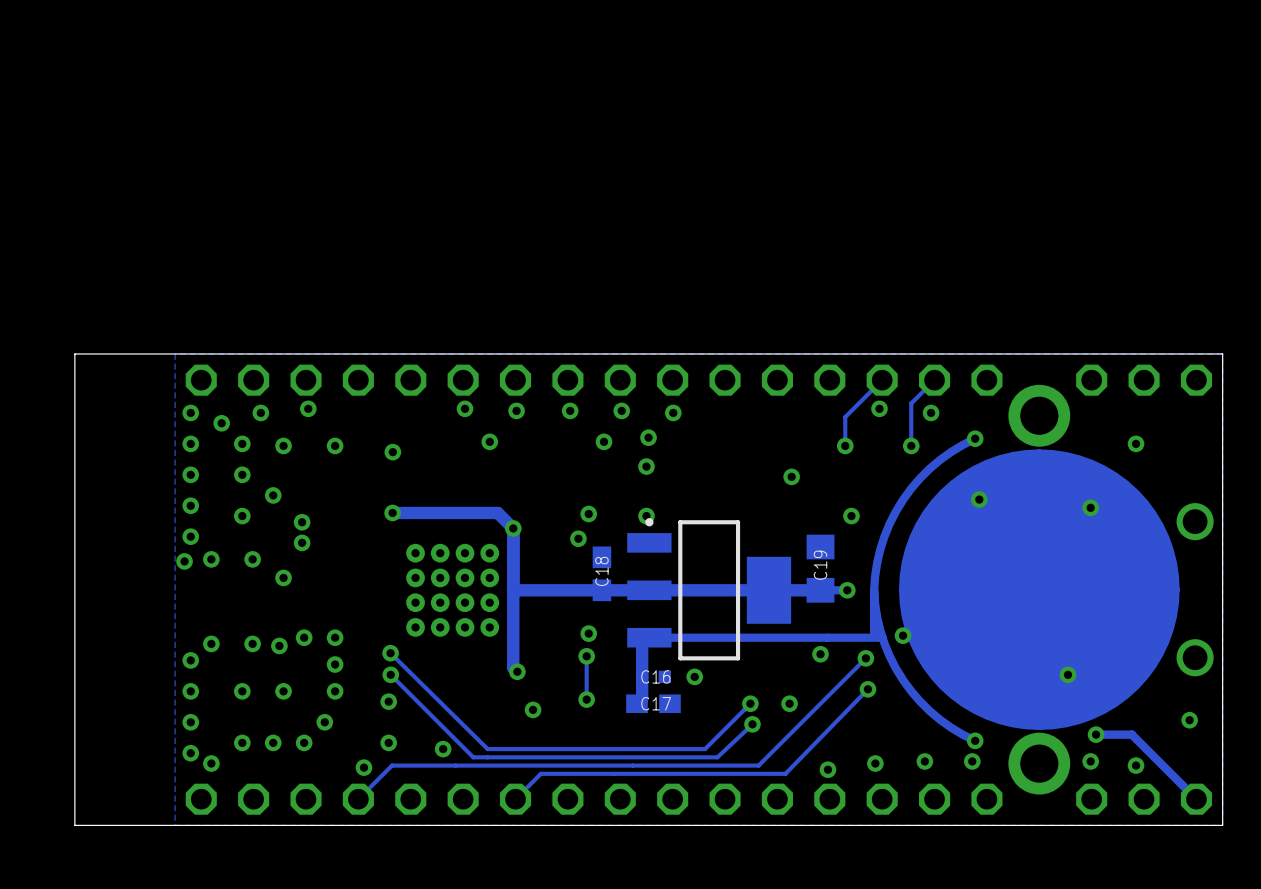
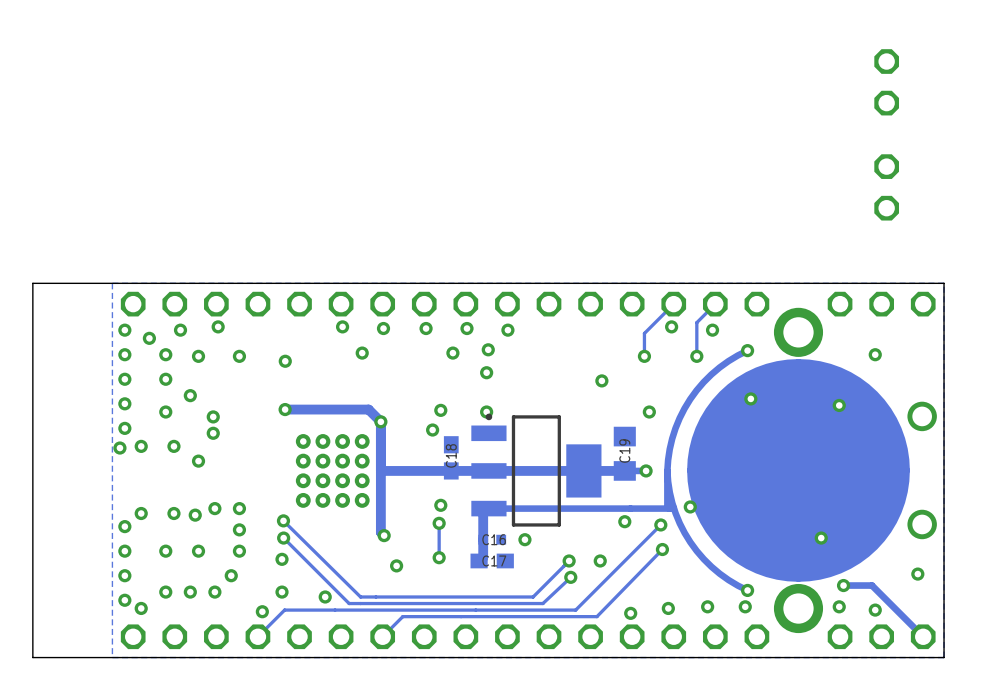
part: none -> (886, 82)
part: none -> (886, 187)

